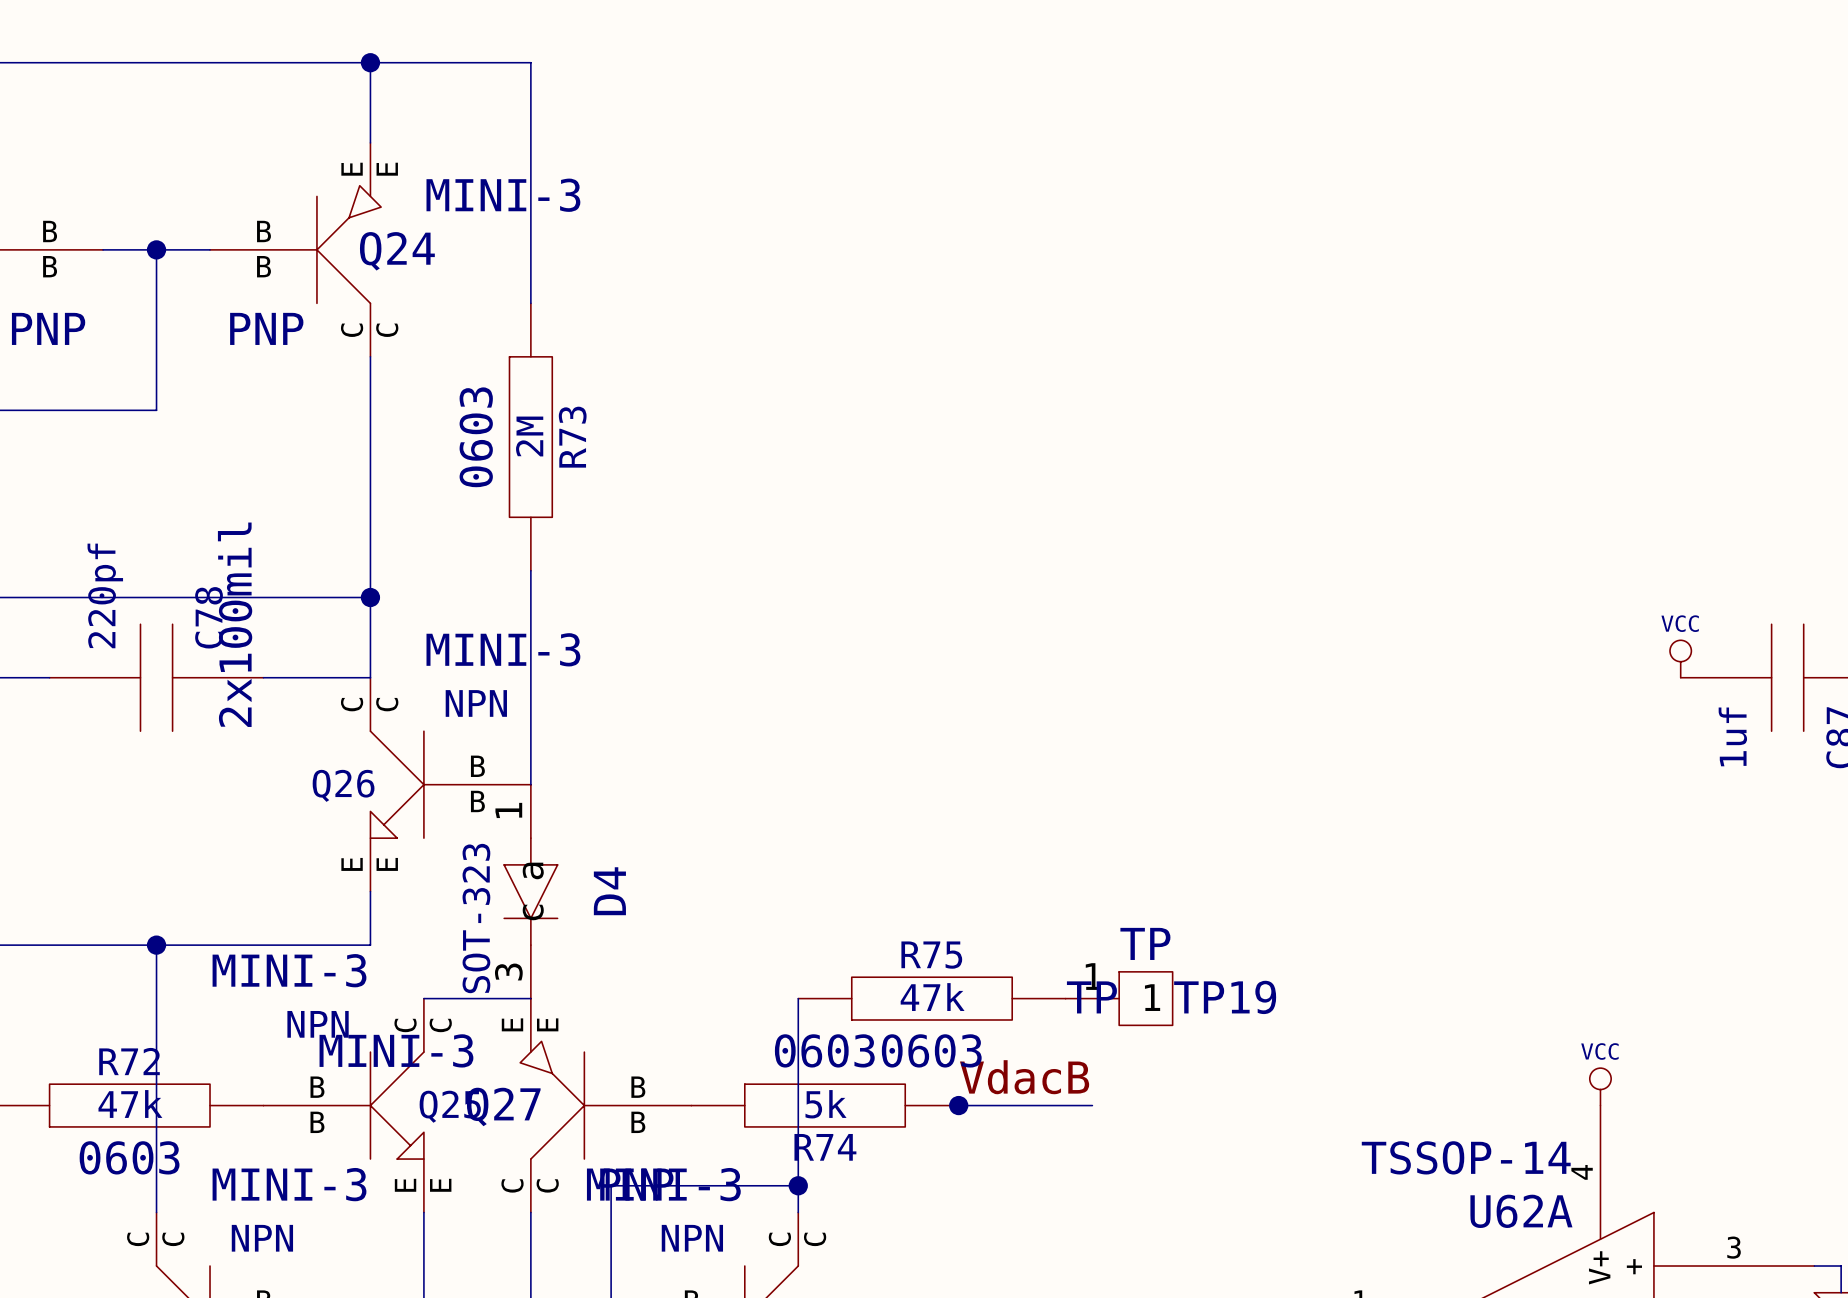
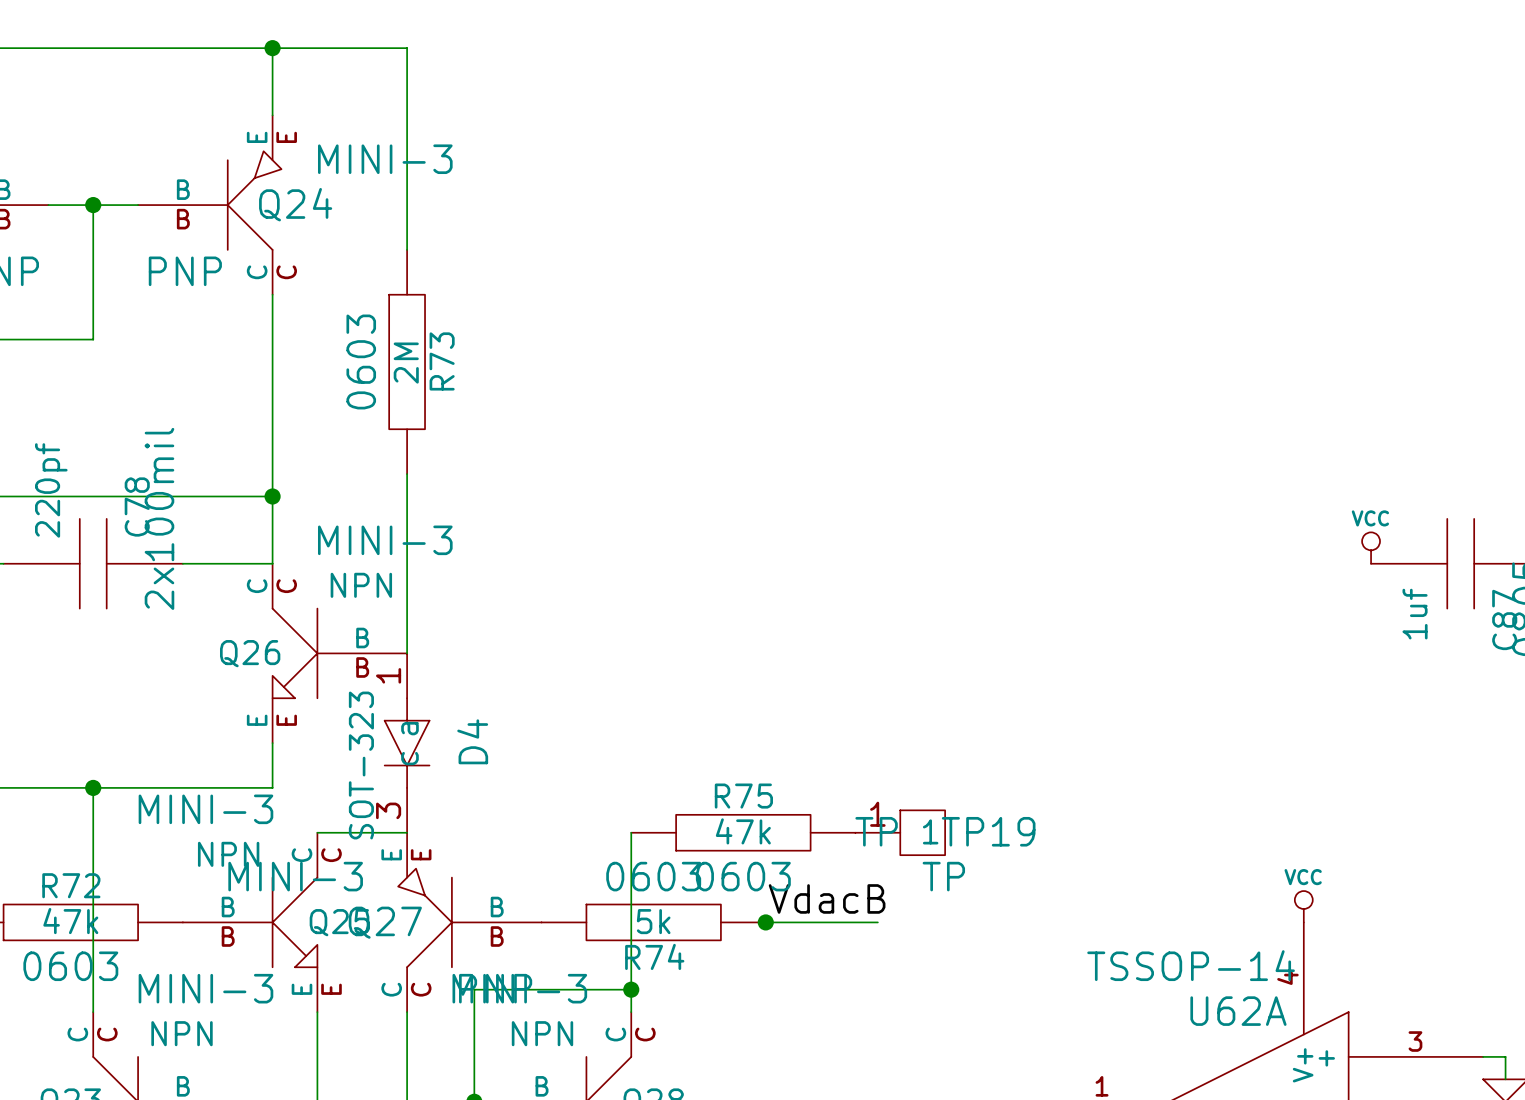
TP19 text position: TP (1145, 943) -> TP (943, 876)

